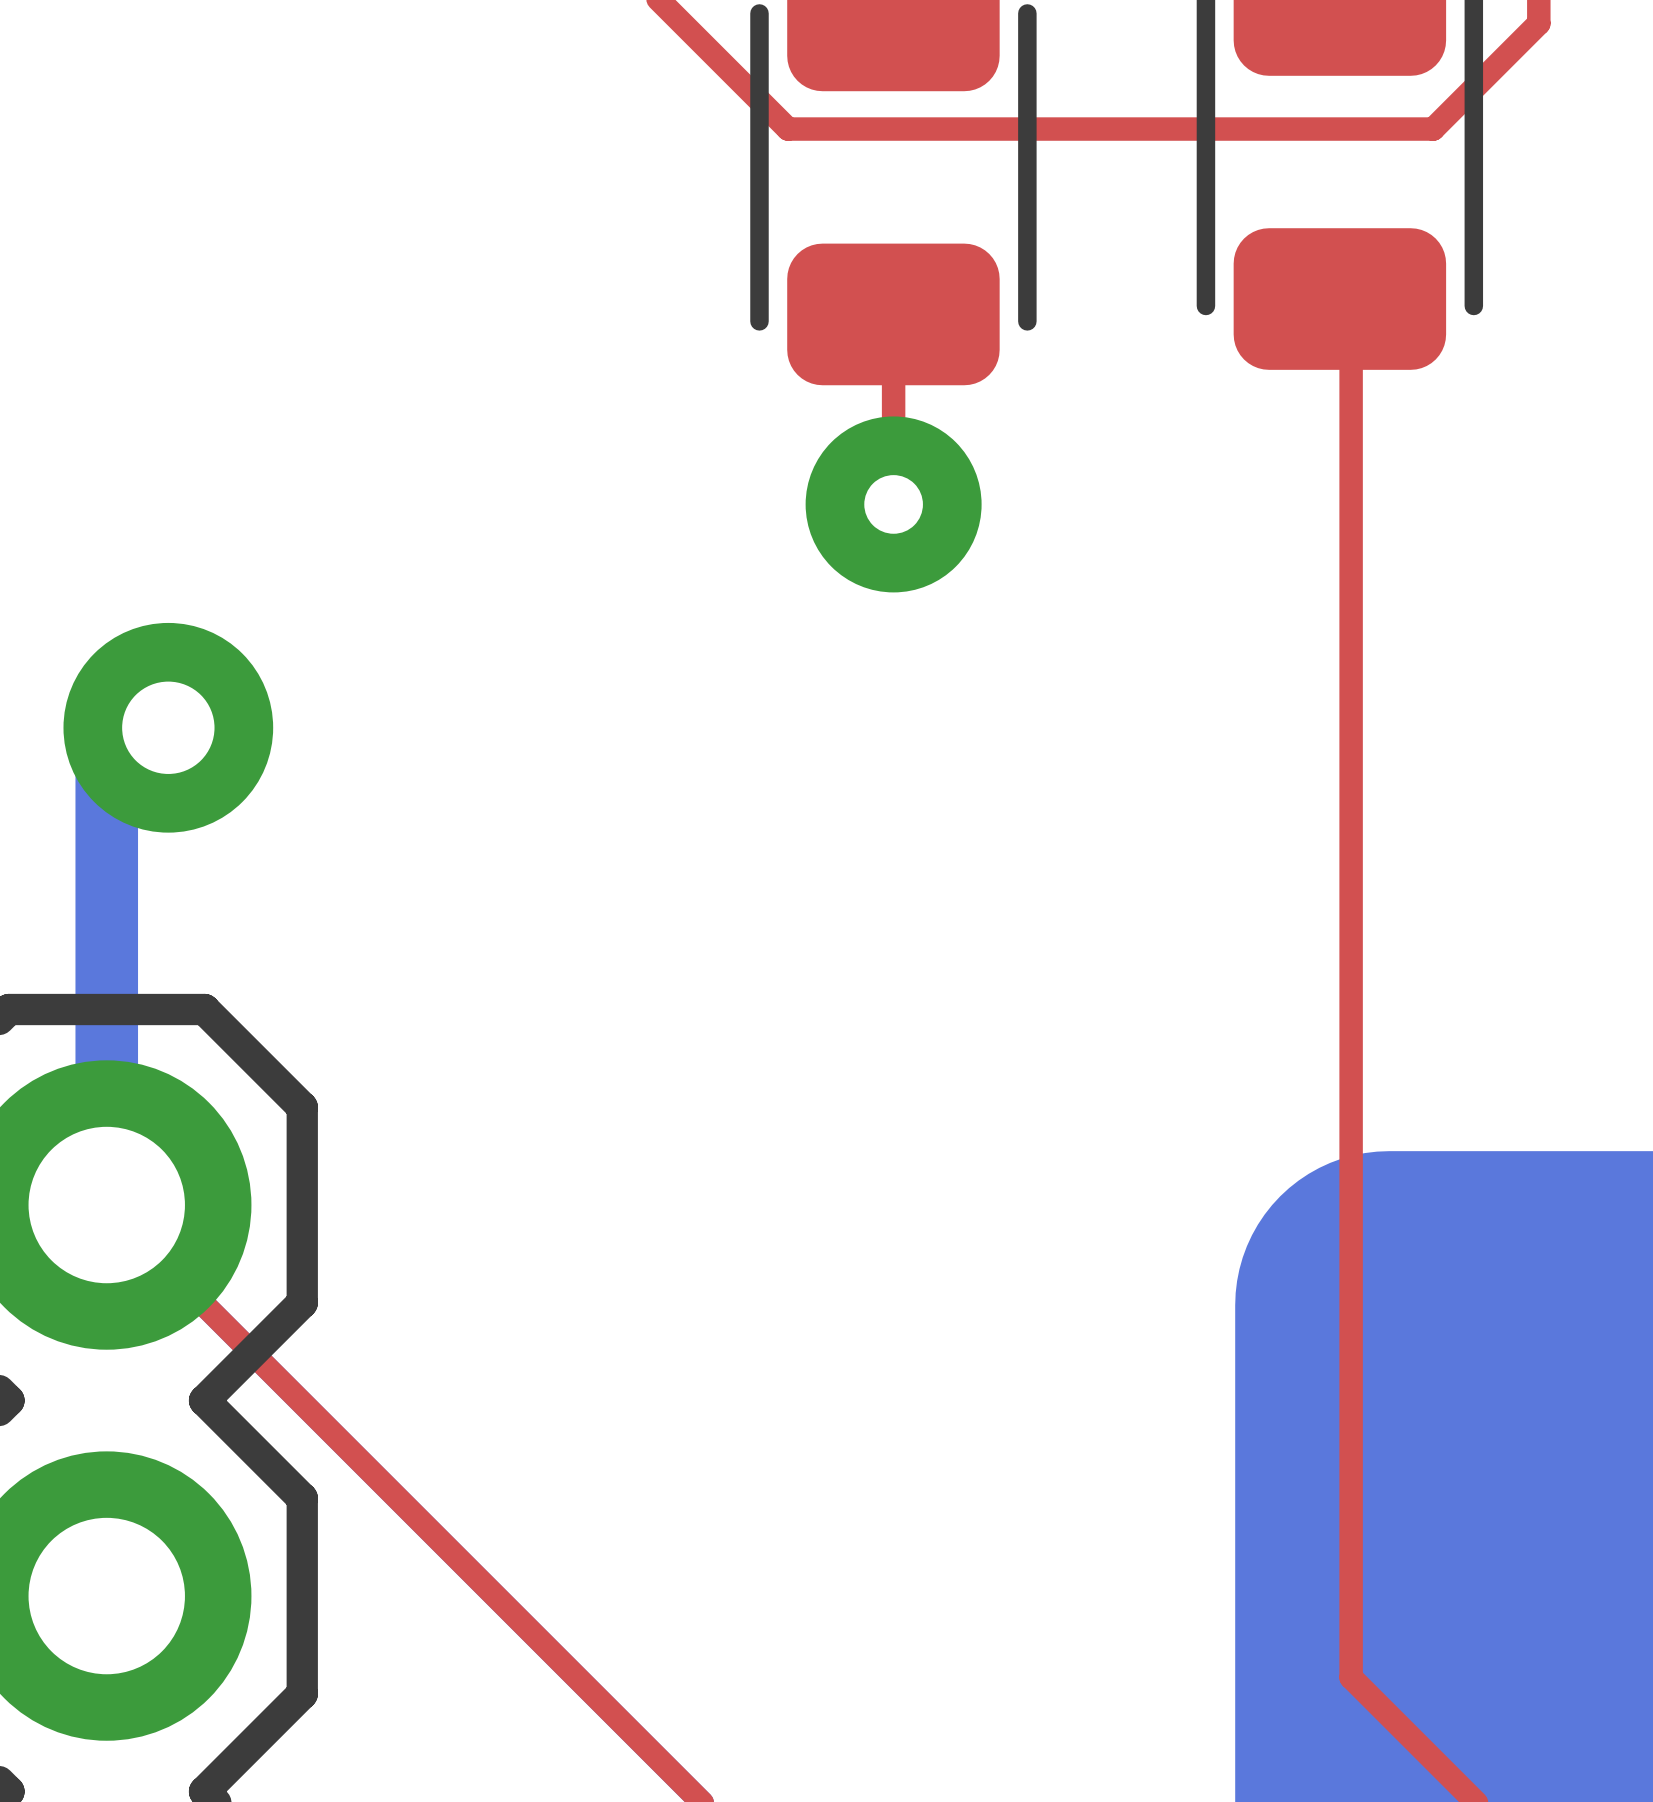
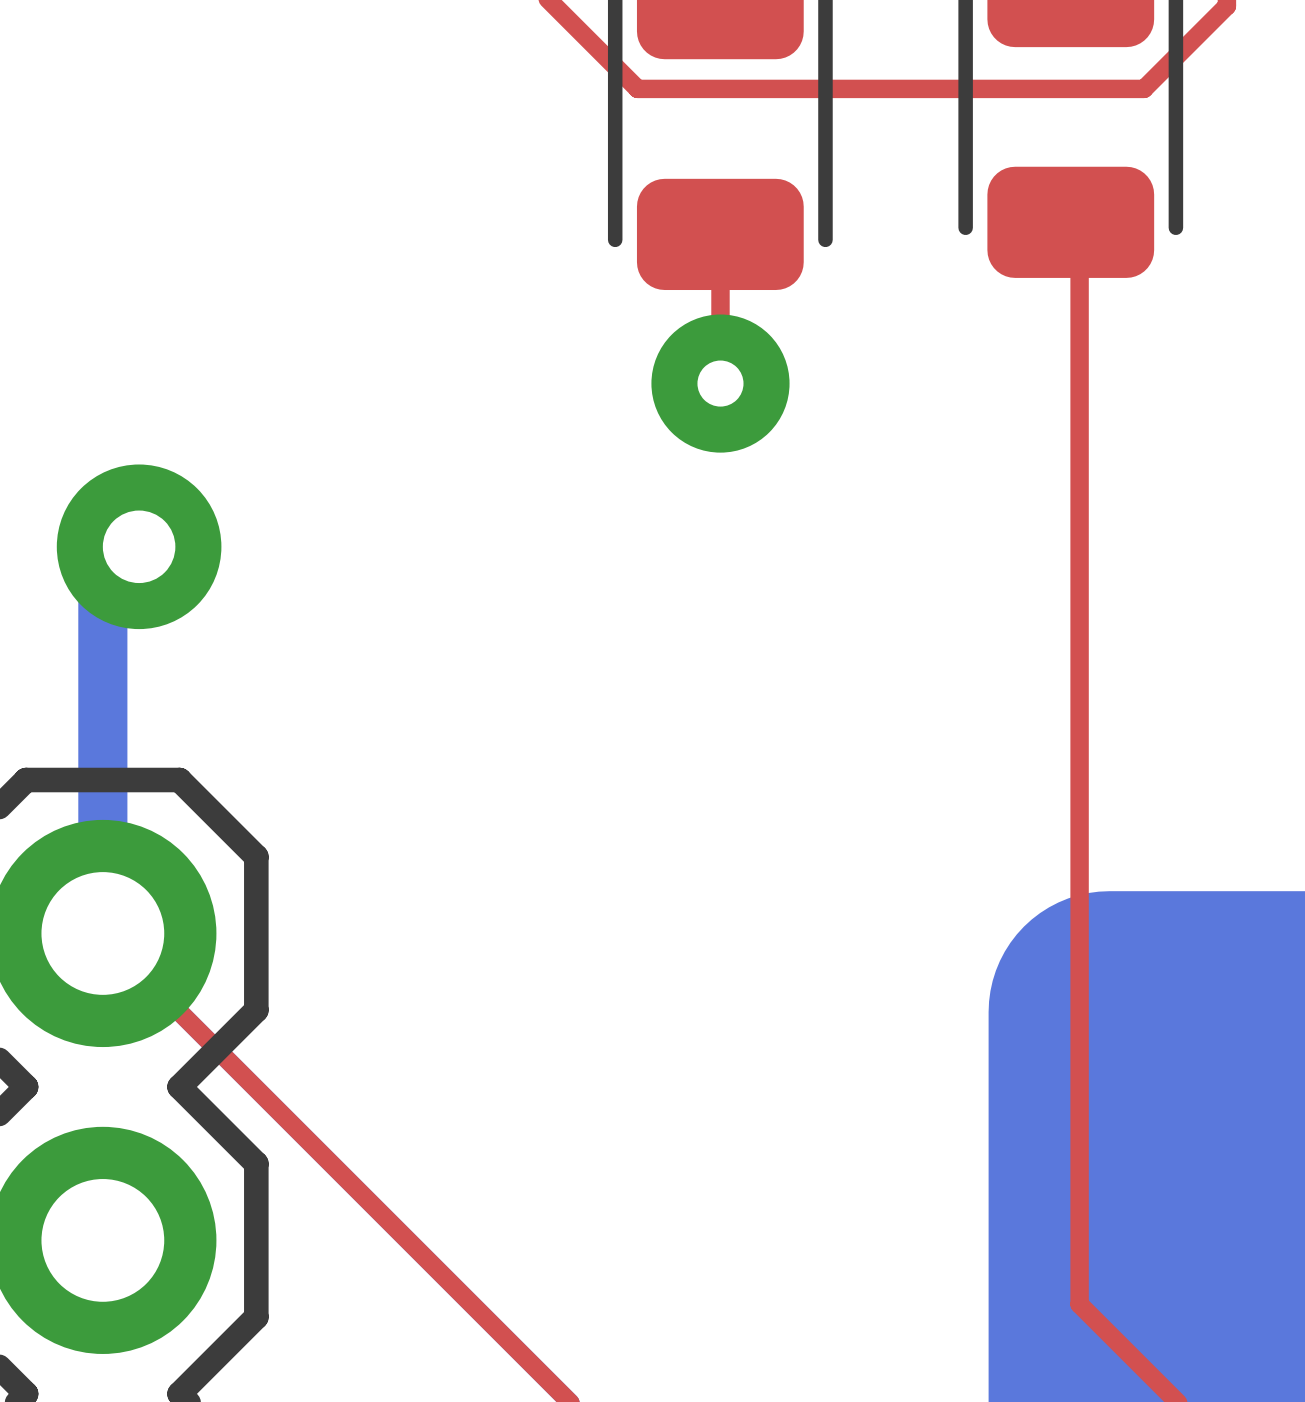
via position: (168, 727) -> (139, 546)

